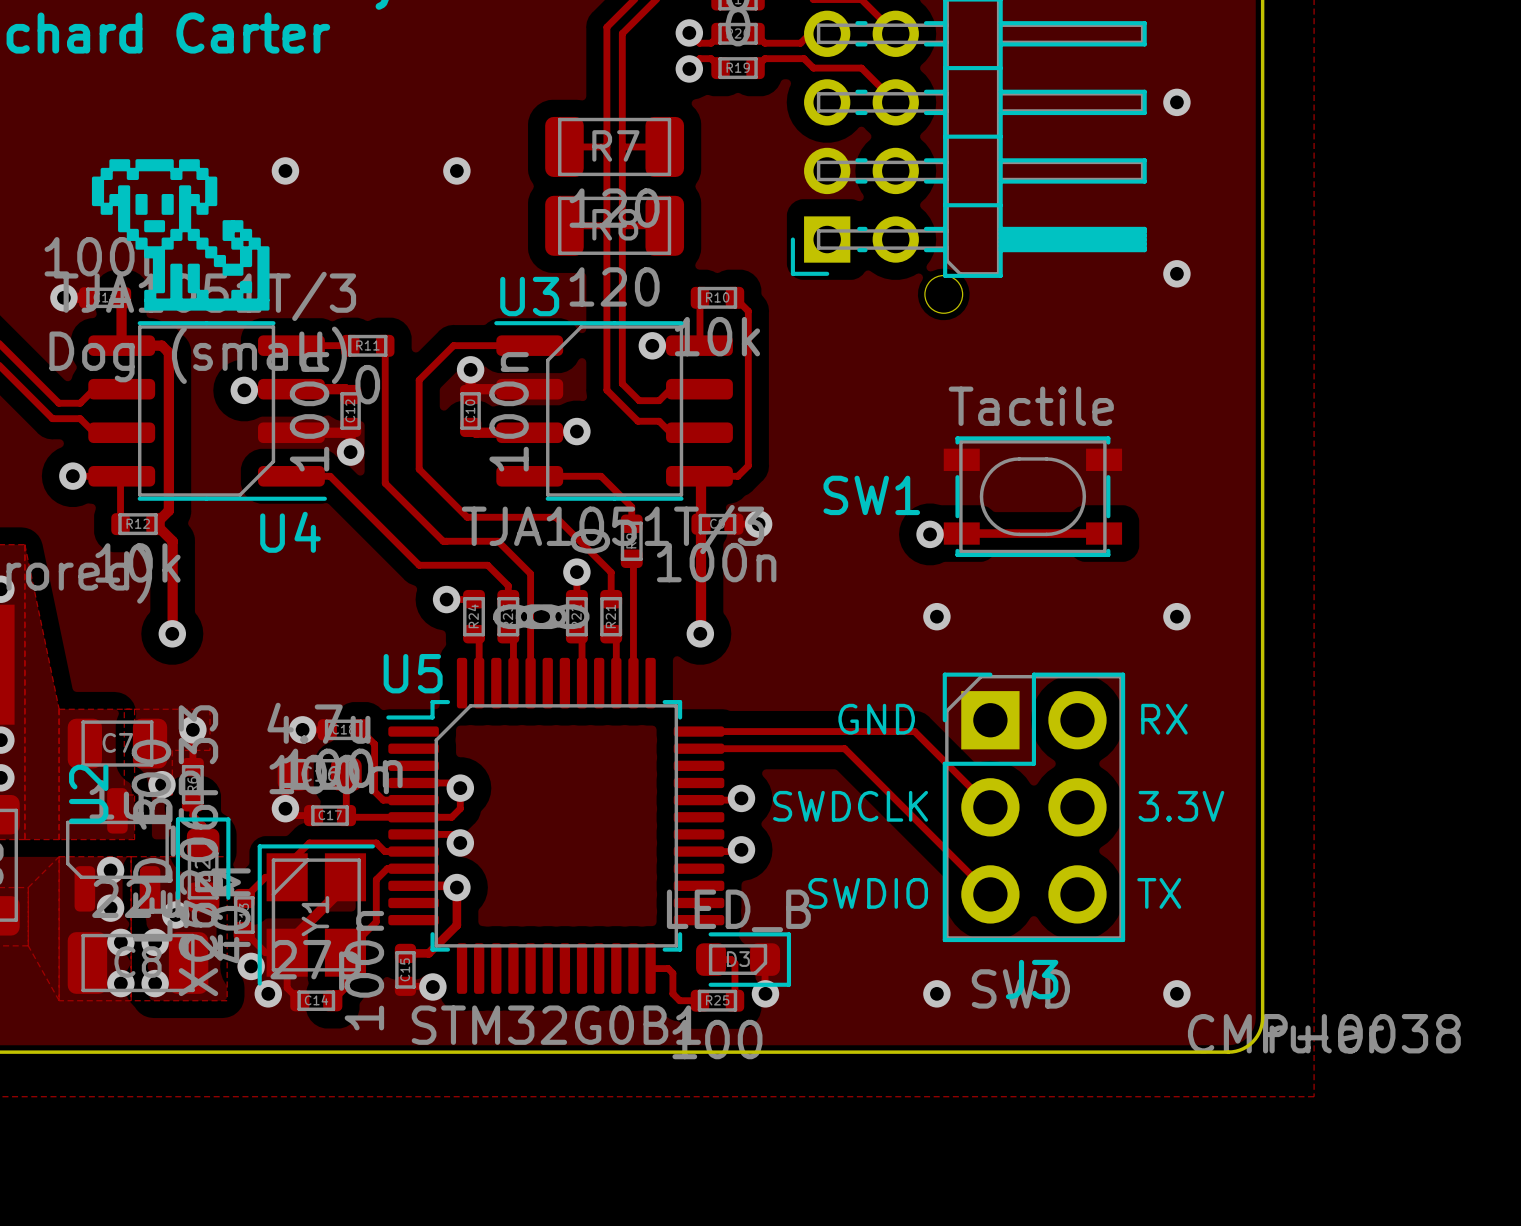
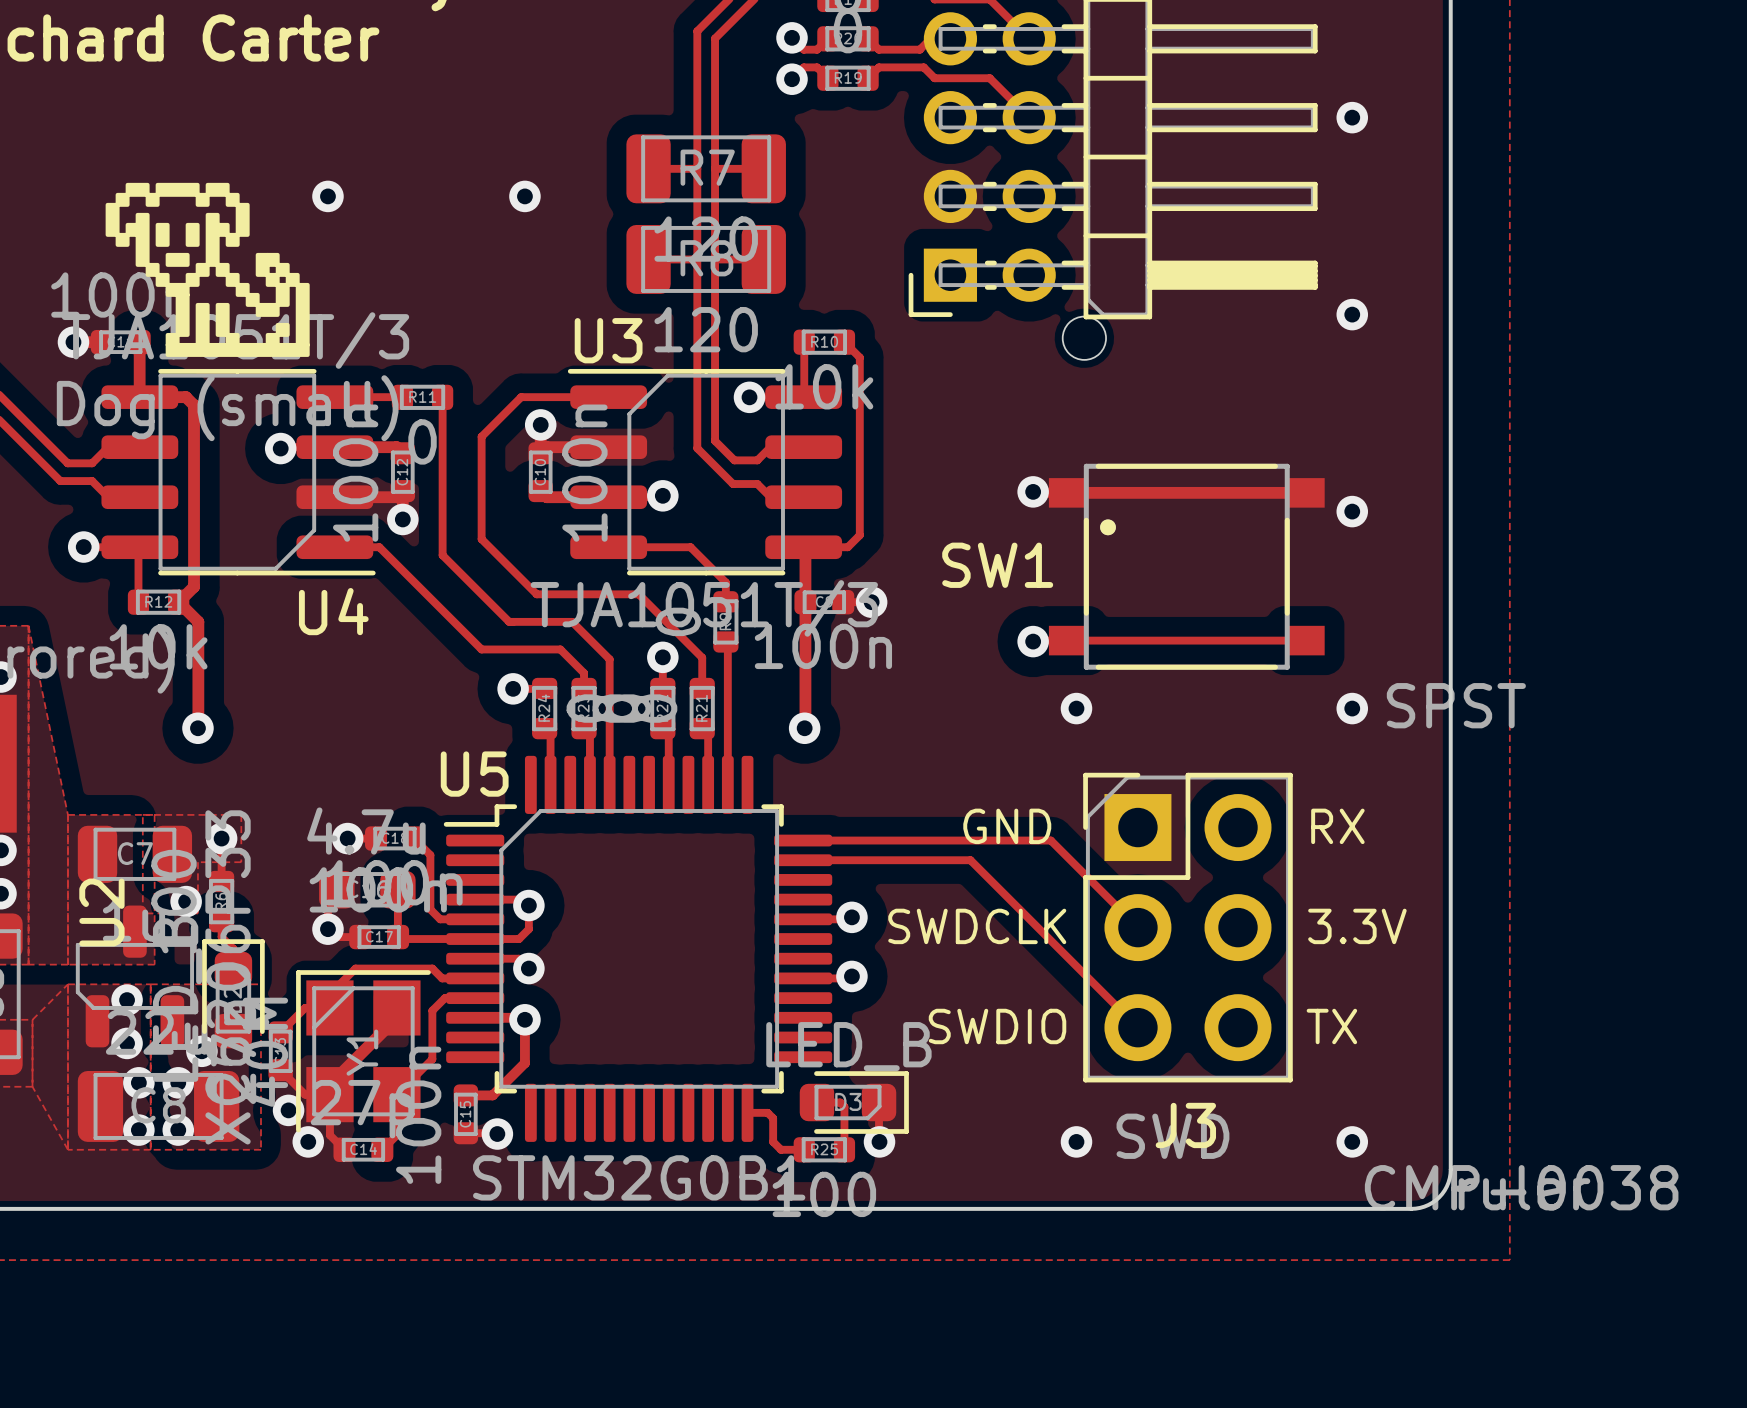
SW1 value: Tactile (1031, 406) -> SPST (1456, 705)
track: none -> (1033, 491) (1304, 492)
via: none -> (1033, 491)
SW1 footprint: [943, 436, 1123, 558] -> [1048, 463, 1325, 670]
via: none -> (1352, 511)
track: (1104, 533) (930, 534) -> none
via position: (930, 534) -> (1033, 641)
track: none -> (1304, 640) (1033, 641)

